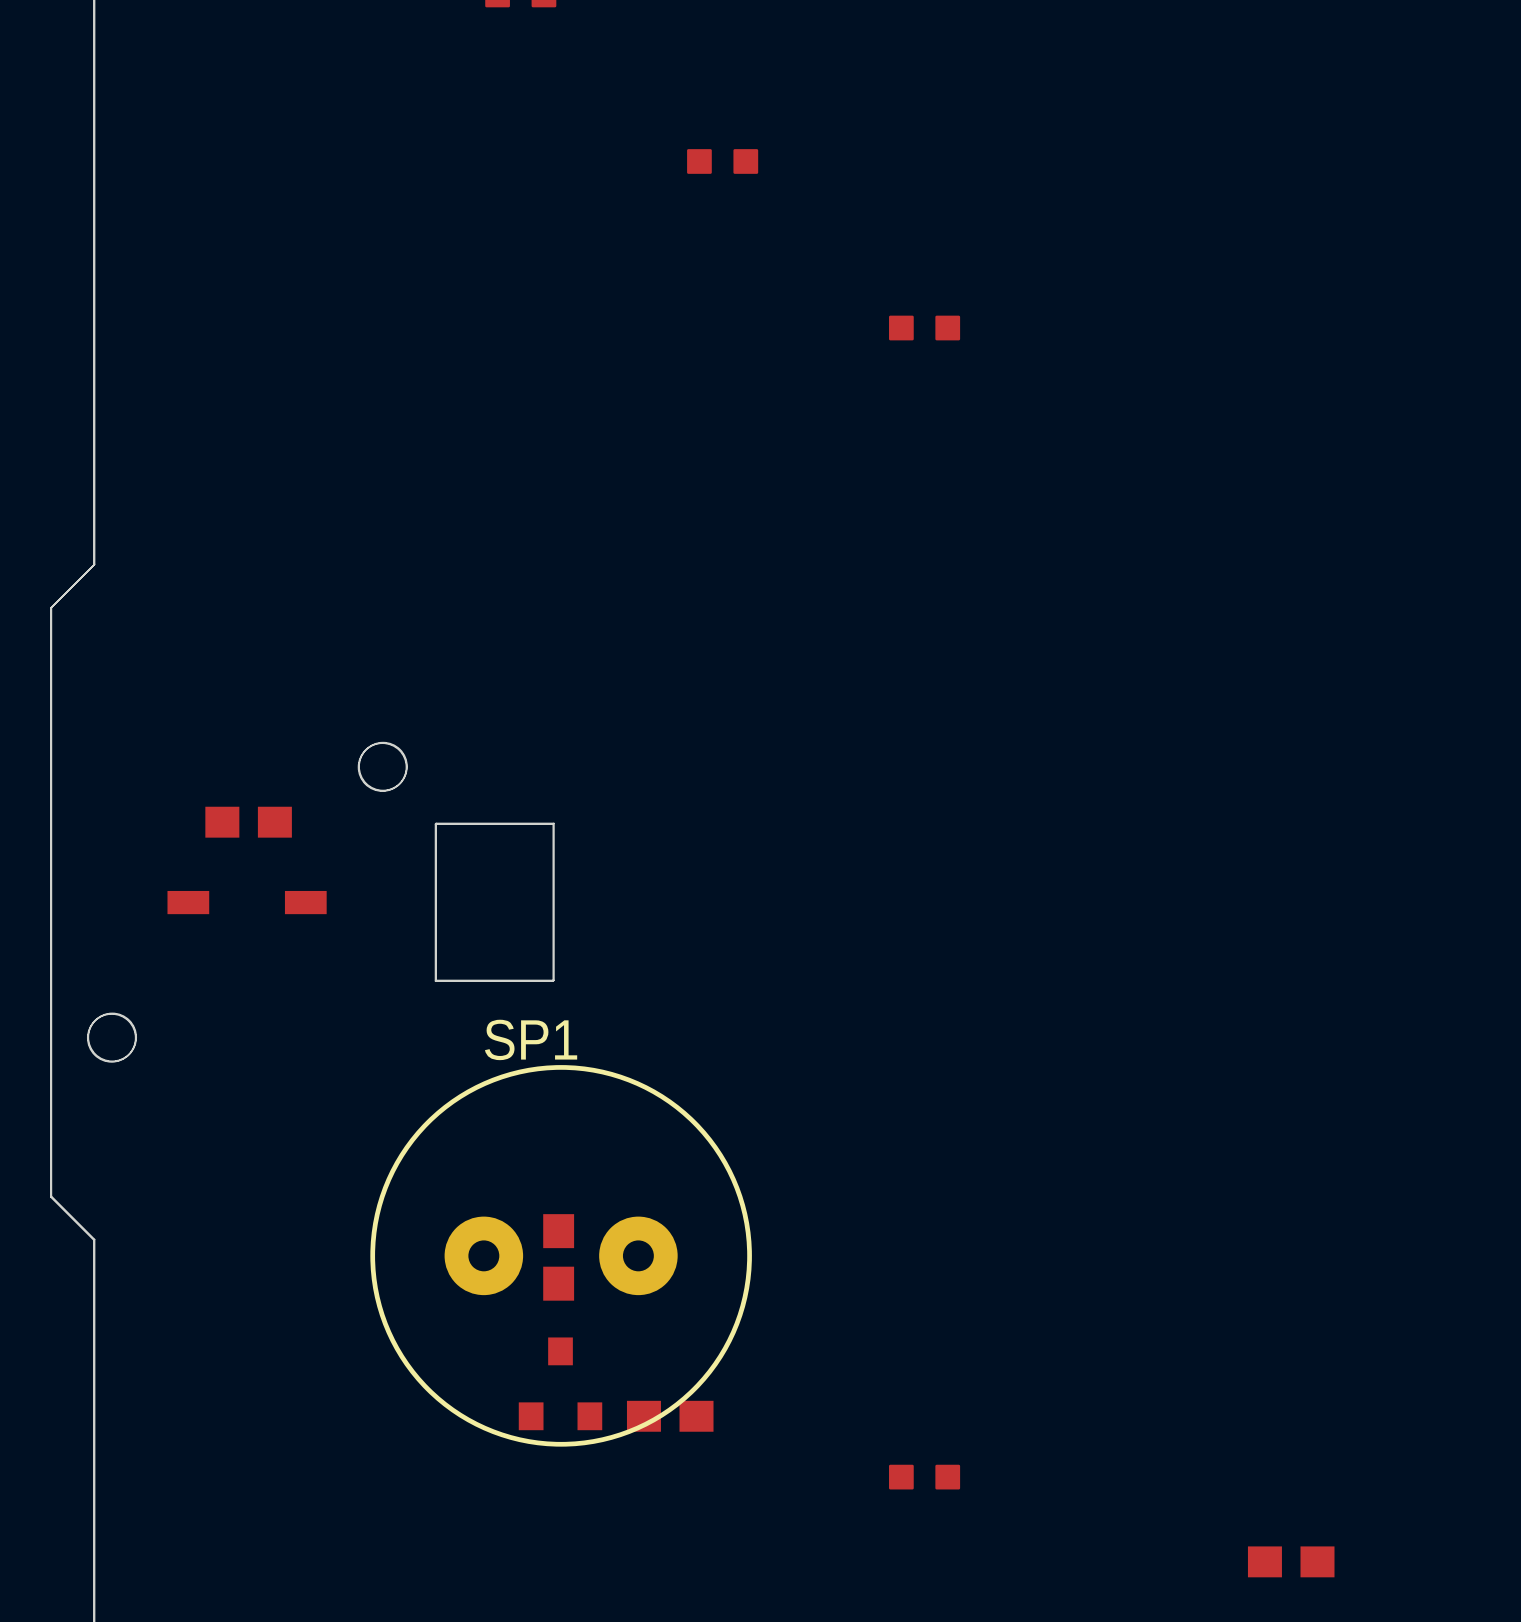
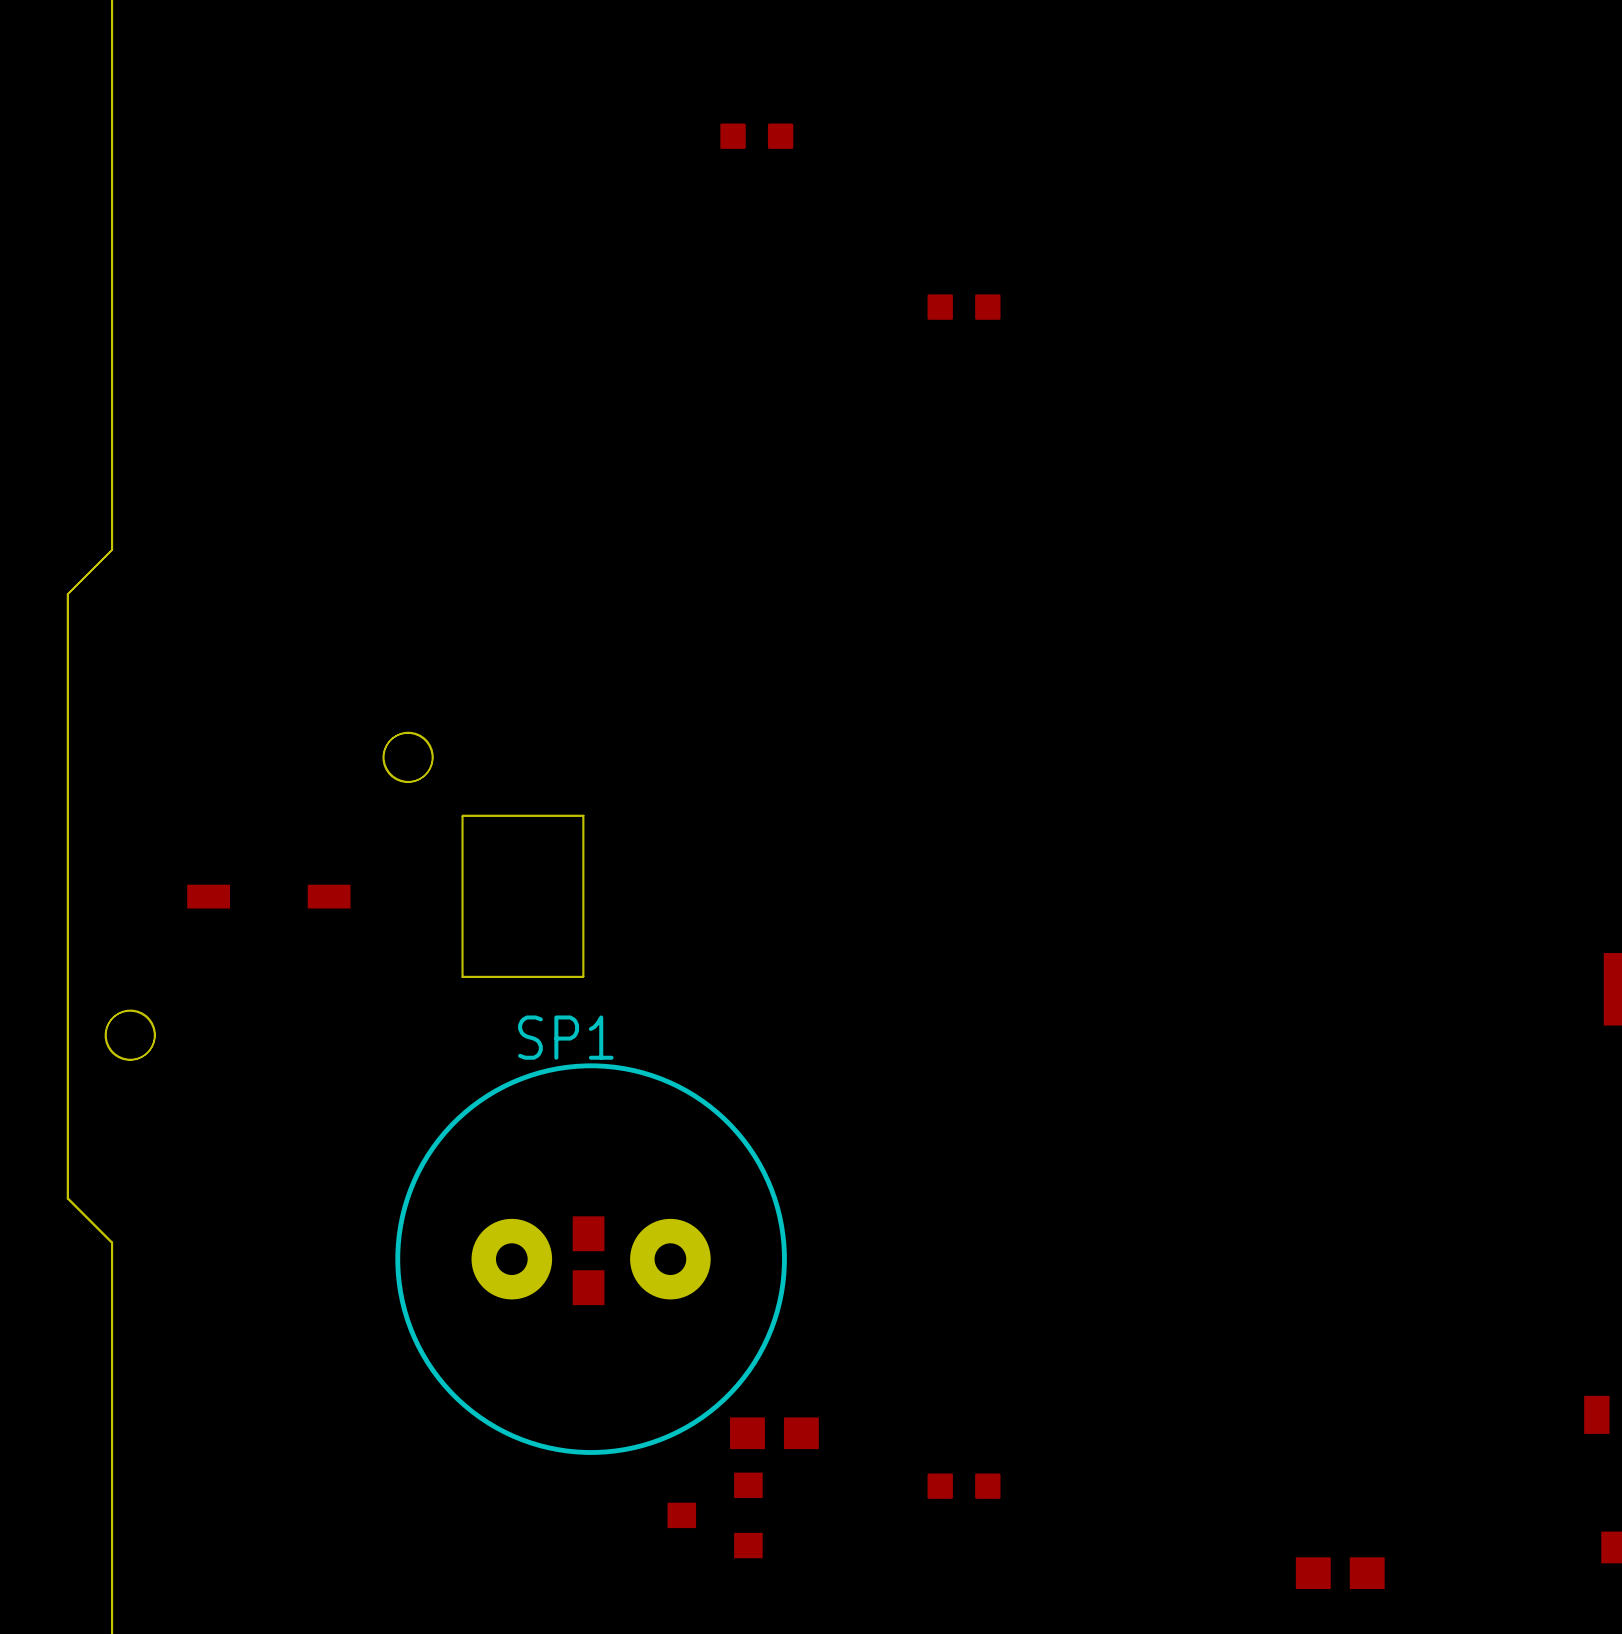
part: (248, 822) -> none
part rotation: 0° (560, 1383) -> 90° counterclockwise (715, 1515)
part position: (560, 1383) -> (715, 1515)
part position: (670, 1416) -> (774, 1433)

